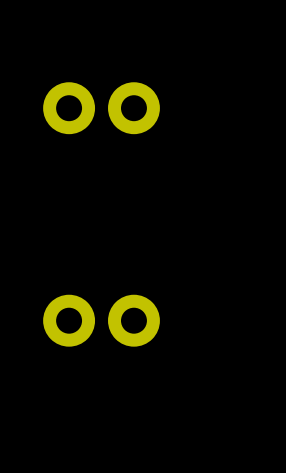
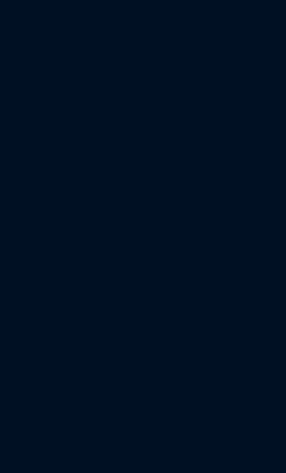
part: (101, 108) -> none
part: (101, 320) -> none

